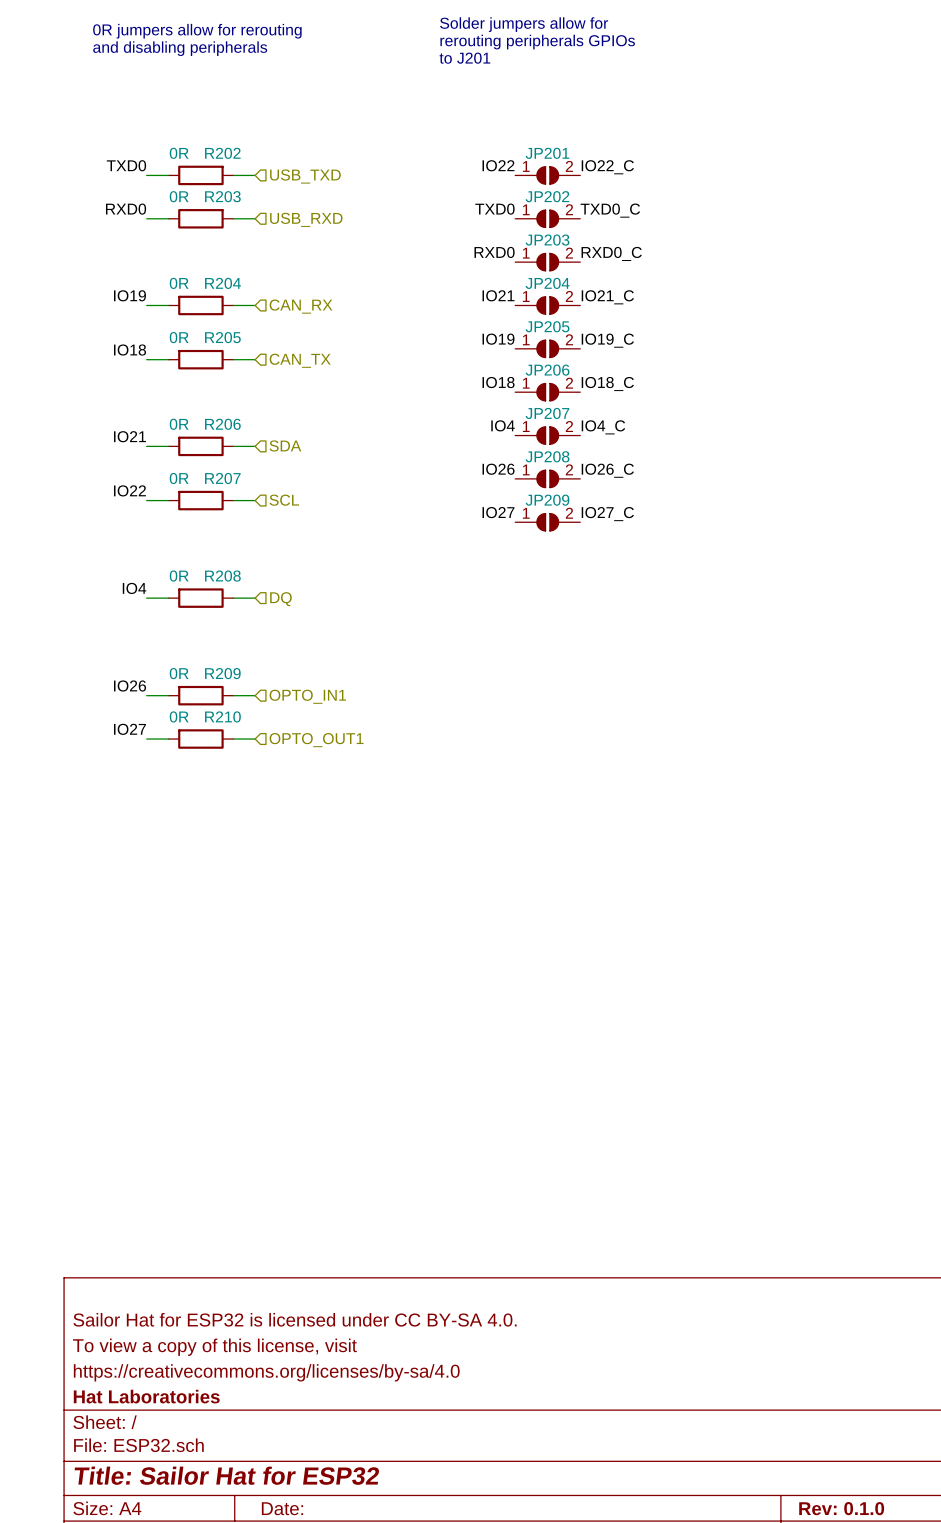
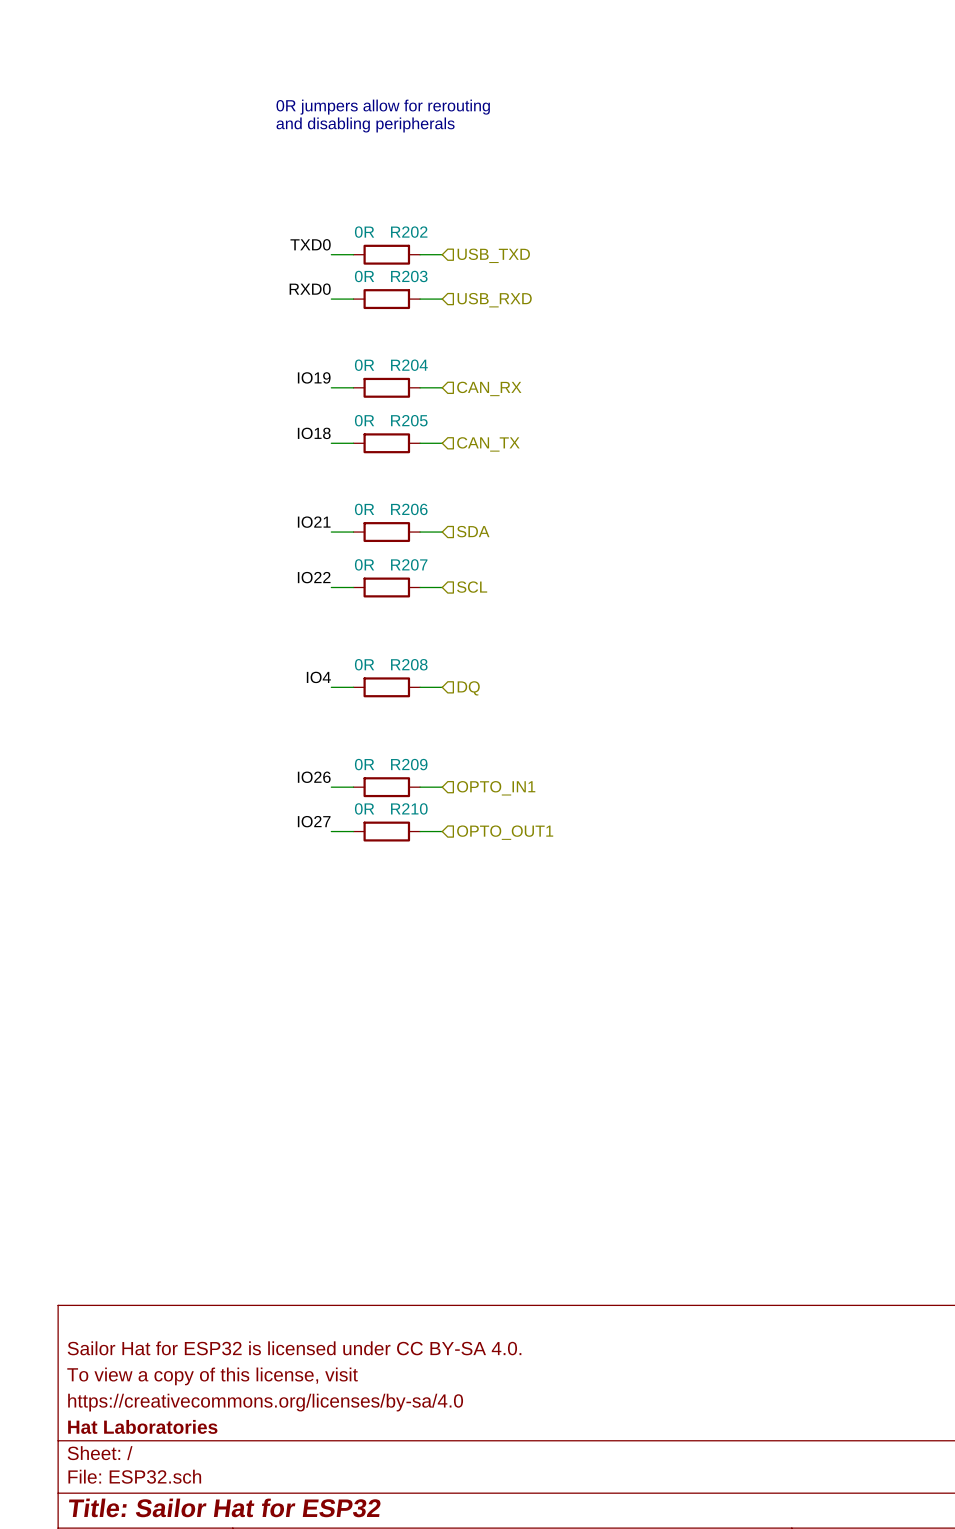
text: Solder jumpers allow for (524, 24) -> none
text position: 0R jumpers allow for rerouting (197, 31) -> 0R jumpers allow for rerouting (383, 107)
text: rerouting peripherals GPIOs (537, 42) -> none
text position: and disabling peripherals (180, 48) -> and disabling peripherals (365, 124)
text: to J201 (464, 58) -> none
label: TXD0 (126, 165) -> none
label: IO22 (498, 165) -> none
label: IO22_C (607, 167) -> none
wire: (146, 175) (168, 175) -> (331, 254) (353, 254)
R202 position: (200, 175) -> (386, 254)
wire: (233, 175) (255, 175) -> (420, 254) (442, 254)
JP201: (547, 175) -> none
hierarchical label position: USB_TXD (305, 176) -> USB_TXD (493, 255)
label: RXD0 (126, 209) -> none
label: TXD0 (494, 209) -> none
label: TXD0_C (610, 210) -> none
wire: (146, 218) (168, 218) -> (331, 299) (353, 299)
R203 position: (200, 218) -> (386, 299)
wire: (233, 218) (255, 218) -> (420, 299) (442, 299)
JP202: (547, 218) -> none
hierarchical label position: USB_RXD (306, 219) -> USB_RXD (494, 300)
label: none -> TXD0 (310, 244)
label: RXD0 (494, 252) -> none
label: RXD0_C (611, 253) -> none
JP203: (547, 262) -> none
label: none -> RXD0 (310, 289)
label: IO19 (130, 295) -> none
label: IO21 (498, 295) -> none
label: IO21_C (607, 297) -> none
wire: (146, 305) (168, 305) -> (331, 387) (353, 387)
R204 position: (200, 305) -> (386, 387)
wire: (233, 305) (255, 305) -> (420, 387) (442, 387)
JP204: (547, 305) -> none
hierarchical label position: CAN_RX (301, 306) -> CAN_RX (489, 388)
label: IO19 (498, 339) -> none
label: IO19_C (607, 340) -> none
JP205: (547, 348) -> none
label: IO18 (130, 350) -> none
wire: (146, 359) (168, 359) -> (331, 443) (353, 443)
R205 position: (200, 359) -> (386, 443)
wire: (233, 359) (255, 359) -> (420, 443) (442, 443)
hierarchical label position: CAN_TX (300, 360) -> CAN_TX (488, 444)
label: none -> IO19 (314, 377)
label: IO18 (498, 382) -> none
label: IO18_C (607, 384) -> none
JP206: (547, 392) -> none
label: none -> IO18 (314, 433)
label: IO4 (503, 425) -> none
label: IO4_C (603, 427) -> none
JP207: (547, 435) -> none
label: IO21 (129, 436) -> none
hierarchical label position: SDA (285, 445) -> SDA (473, 531)
wire: (146, 446) (168, 446) -> (331, 532) (353, 532)
R206 position: (200, 446) -> (386, 532)
wire: (233, 446) (255, 446) -> (420, 532) (442, 532)
label: IO26 (498, 469) -> none
label: IO26_C (607, 470) -> none
JP208: (547, 478) -> none
label position: IO22 (129, 490) -> IO22 (314, 577)
wire: (146, 500) (168, 500) -> (331, 587) (353, 587)
R207 position: (200, 500) -> (386, 587)
wire: (233, 500) (255, 500) -> (420, 587) (442, 587)
hierarchical label position: SCL (284, 500) -> SCL (472, 587)
label: none -> IO21 (314, 522)
label: IO27 (498, 512) -> none
label: IO27_C (607, 514) -> none
JP209: (547, 522) -> none
label: IO4 (134, 588) -> none
wire: (146, 598) (168, 598) -> (331, 687) (353, 687)
R208 position: (200, 598) -> (386, 687)
wire: (233, 598) (255, 598) -> (420, 687) (442, 687)
hierarchical label position: DQ (280, 599) -> DQ (468, 688)
label: none -> IO4 (318, 677)
label: IO26 (130, 685) -> none
wire: (146, 695) (168, 695) -> (331, 787) (353, 787)
R209 position: (200, 695) -> (386, 787)
wire: (233, 695) (255, 695) -> (420, 787) (442, 787)
hierarchical label position: OPTO_IN1 (307, 696) -> OPTO_IN1 (496, 788)
label: IO27 (129, 729) -> none
wire: (146, 739) (168, 739) -> (331, 831) (353, 831)
R210 position: (200, 739) -> (386, 831)
wire: (233, 739) (255, 739) -> (420, 831) (442, 831)
hierarchical label position: OPTO_OUT1 (316, 740) -> OPTO_OUT1 (505, 832)
label: none -> IO26 (314, 777)
label: none -> IO27 (314, 821)

